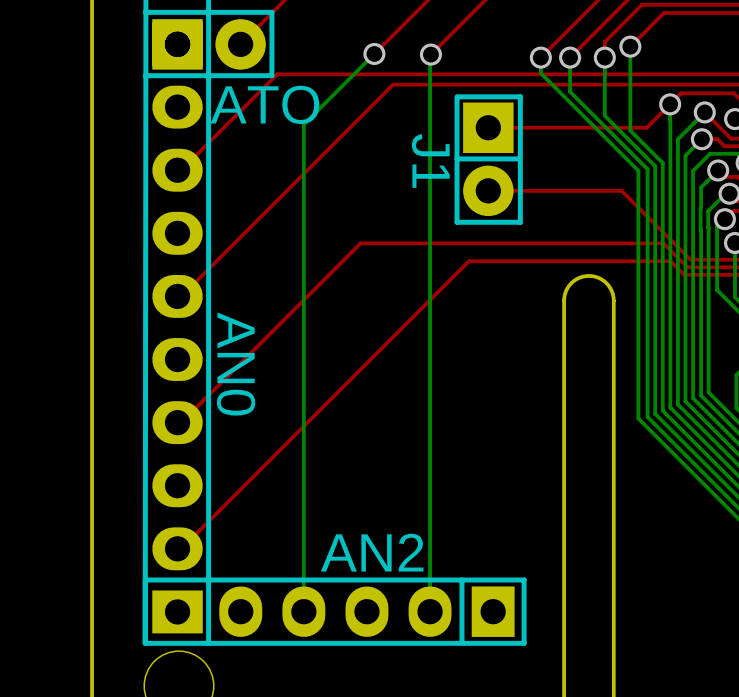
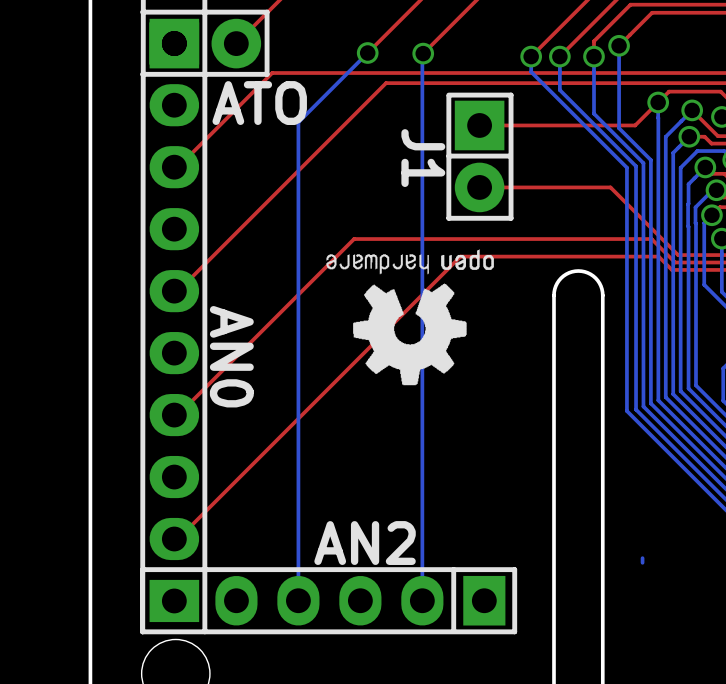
drawing: none -> [326, 249, 494, 386]
bottom track: none -> (642, 558) (642, 562)

